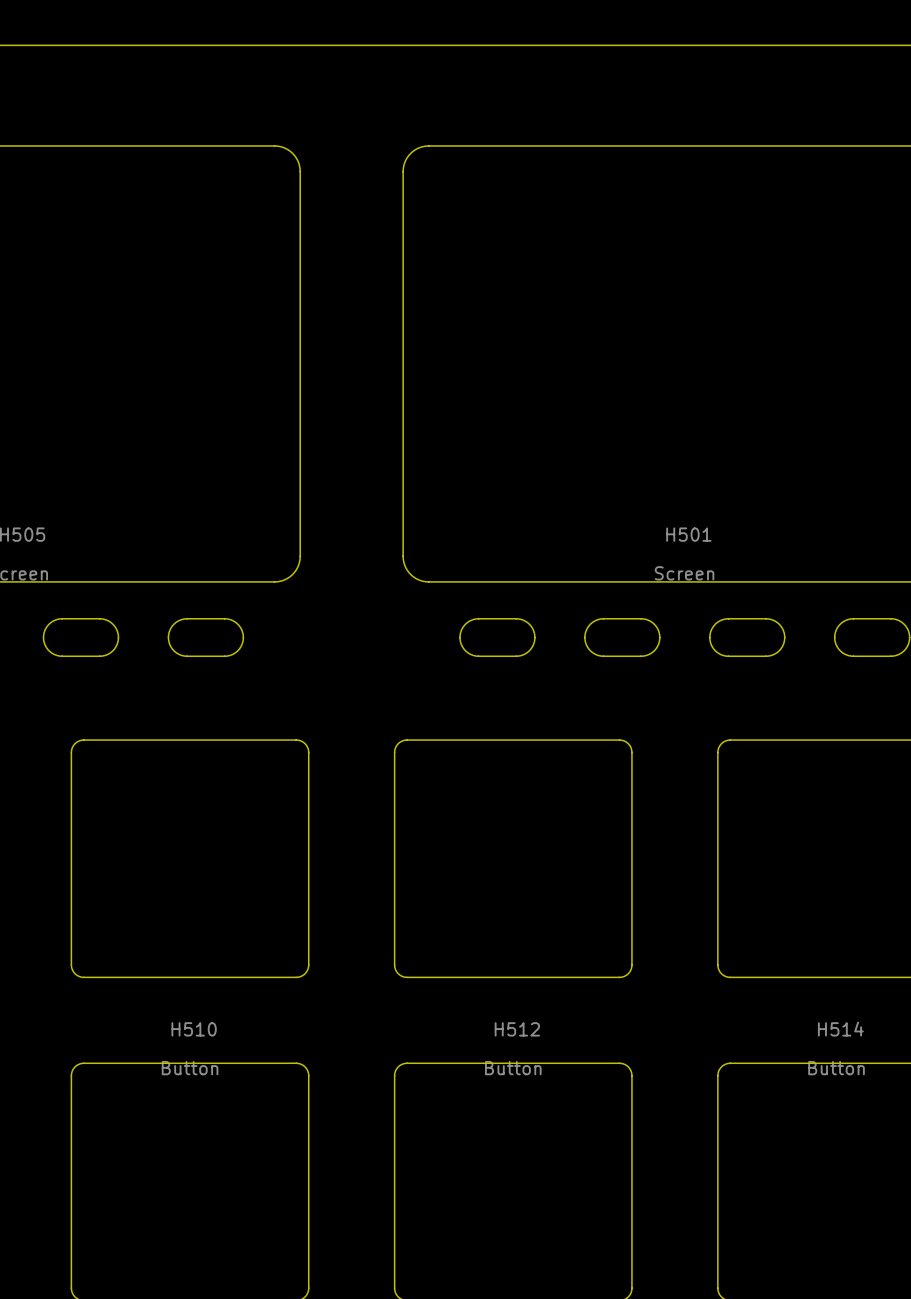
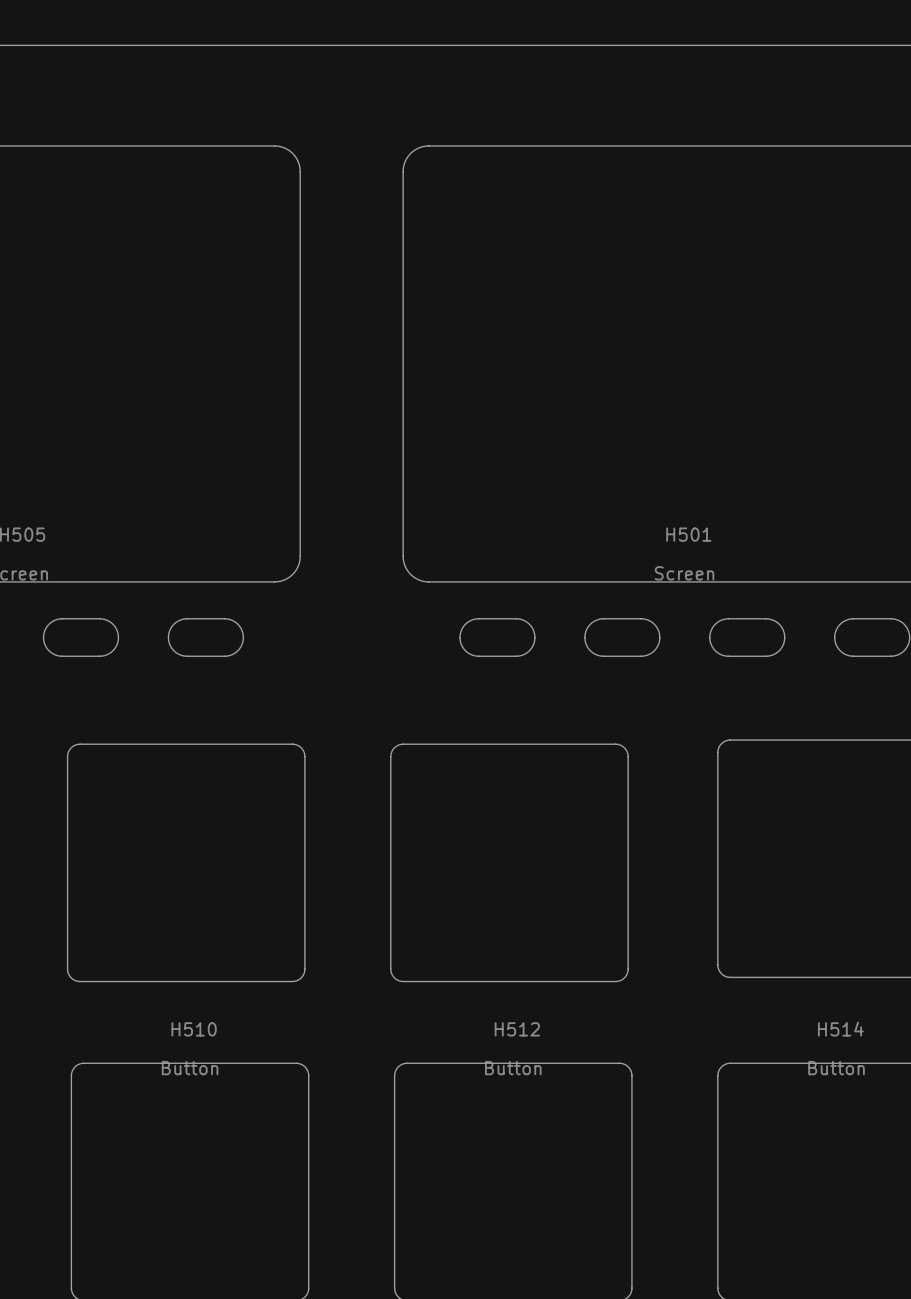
H510 footprint: [71, 739, 310, 978] -> [67, 743, 306, 982]
H512 footprint: [394, 739, 633, 978] -> [390, 743, 629, 982]

